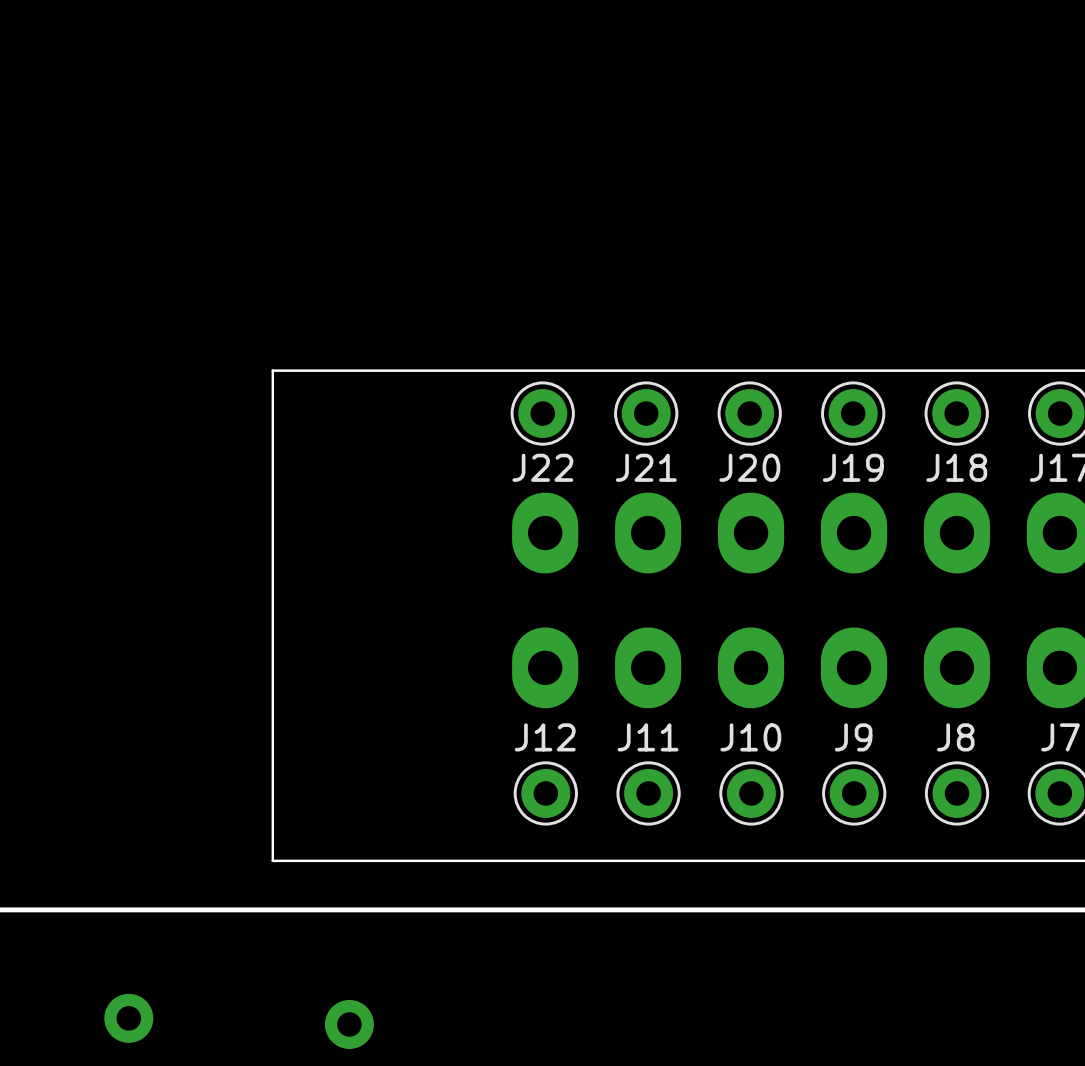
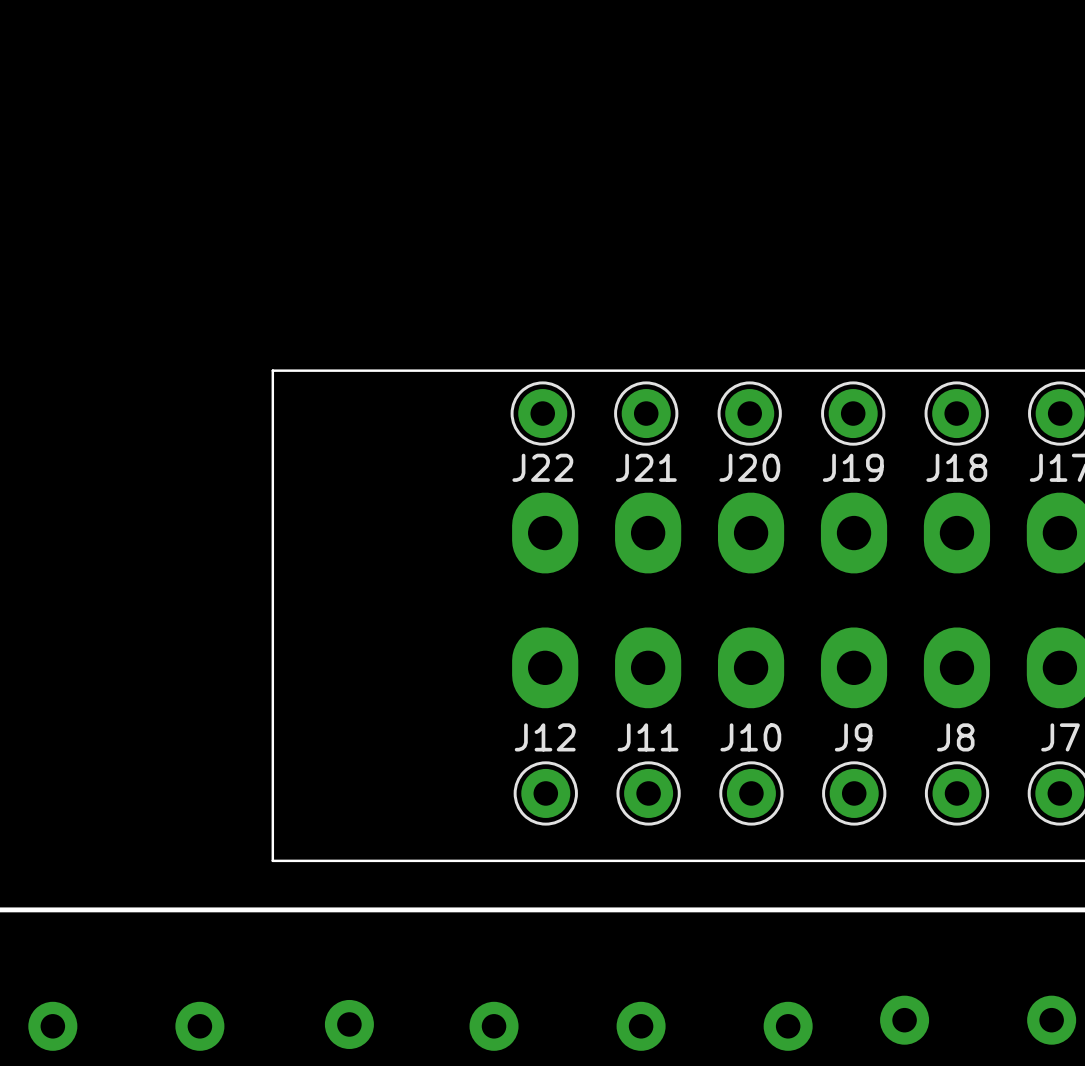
part: (128, 1018) -> none
part: none -> (904, 1020)
part: none -> (1051, 1020)
part: none -> (52, 1026)
part: none -> (199, 1026)
part: none -> (494, 1026)
part: none -> (641, 1026)
part: none -> (788, 1026)

